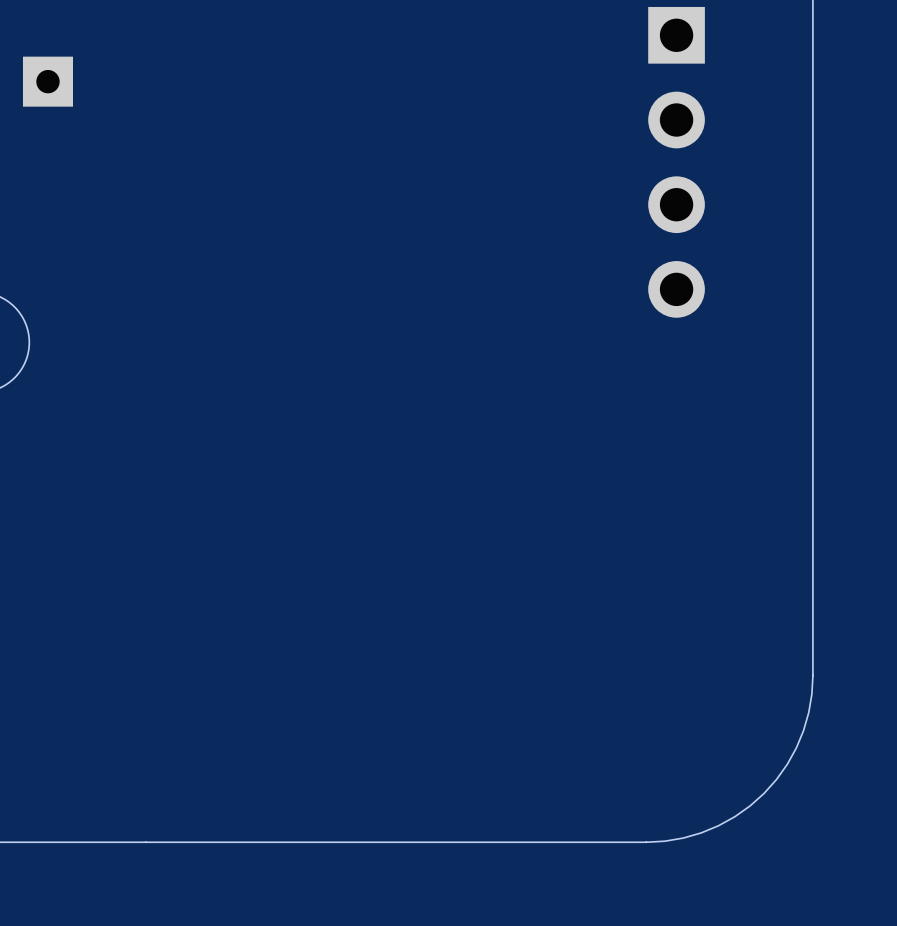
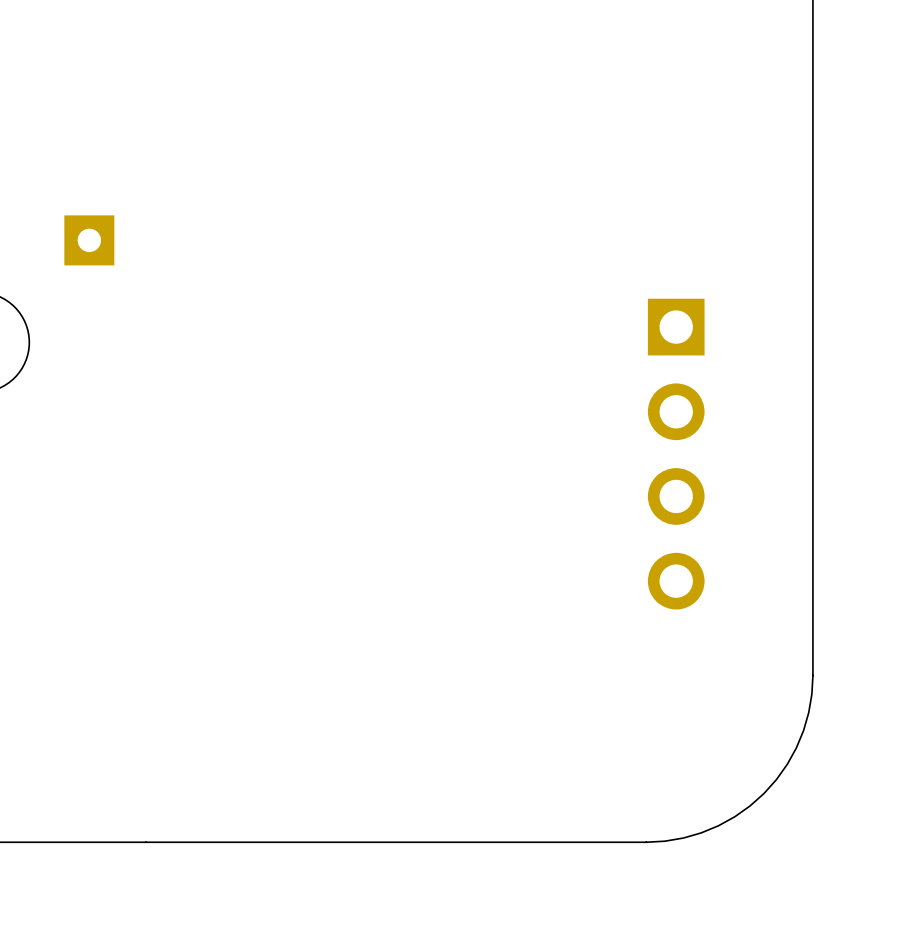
part position: (47, 81) -> (89, 240)
part position: (676, 162) -> (676, 454)

